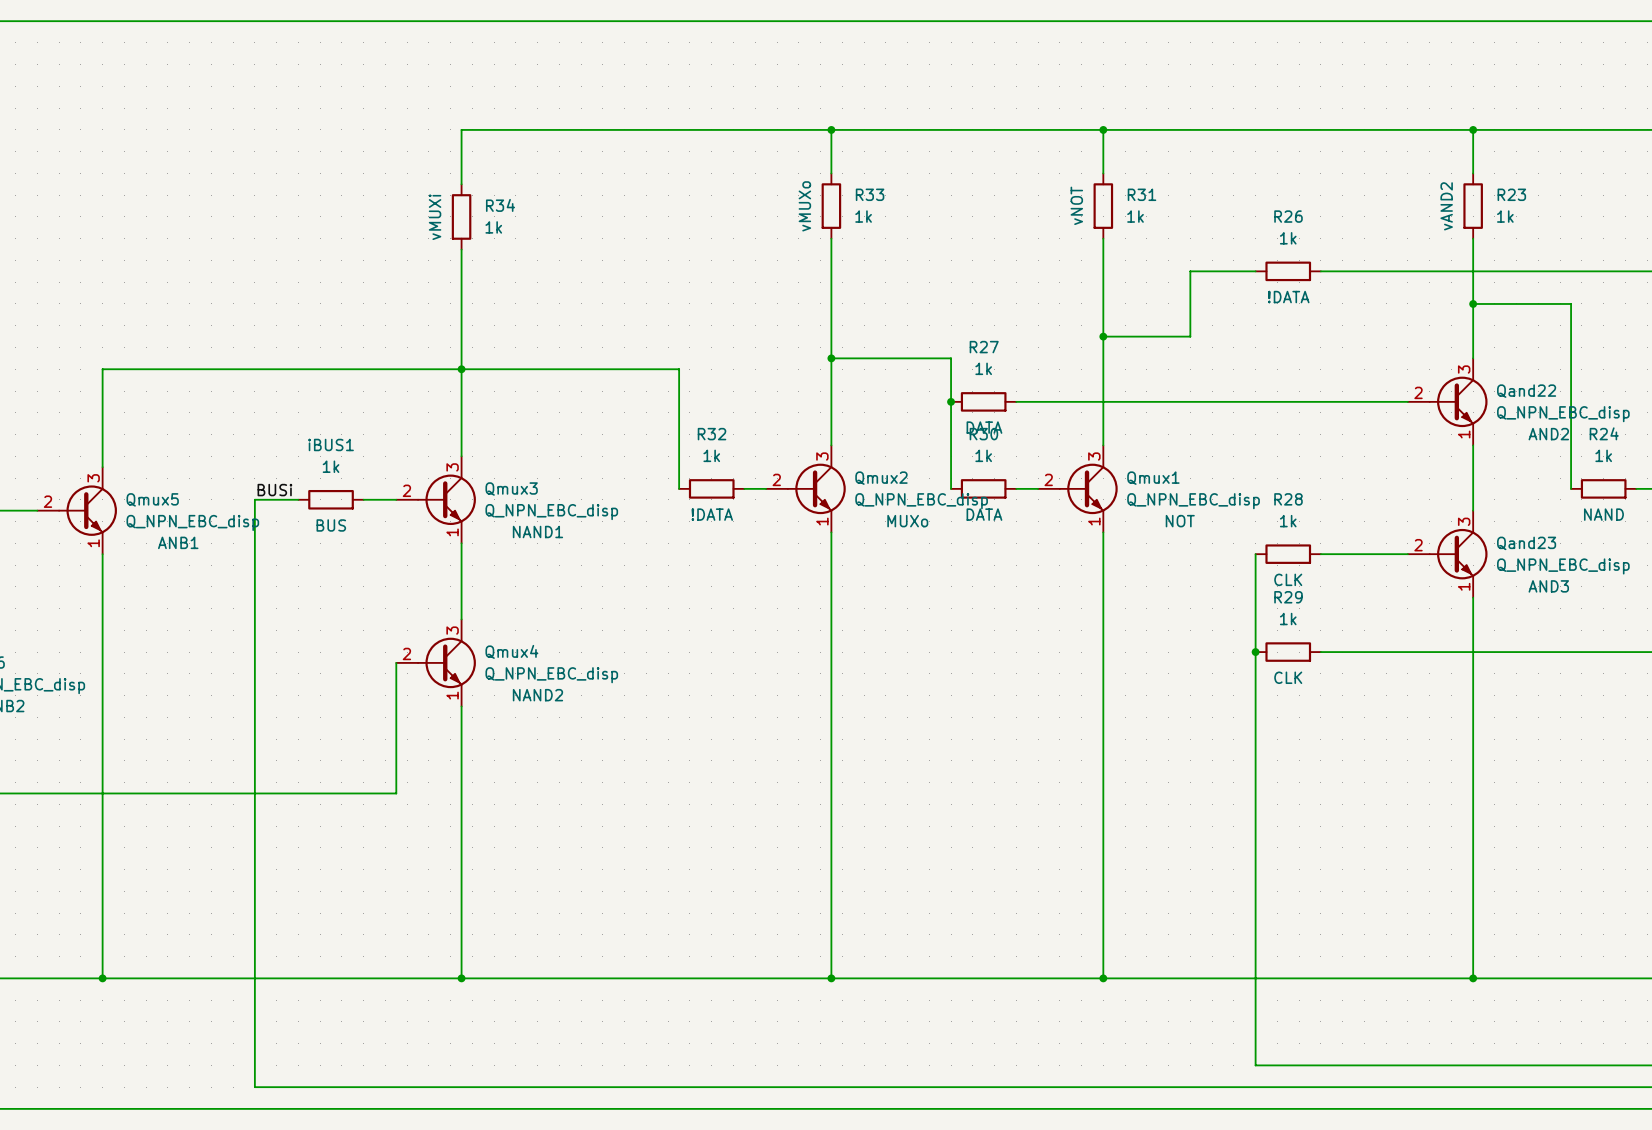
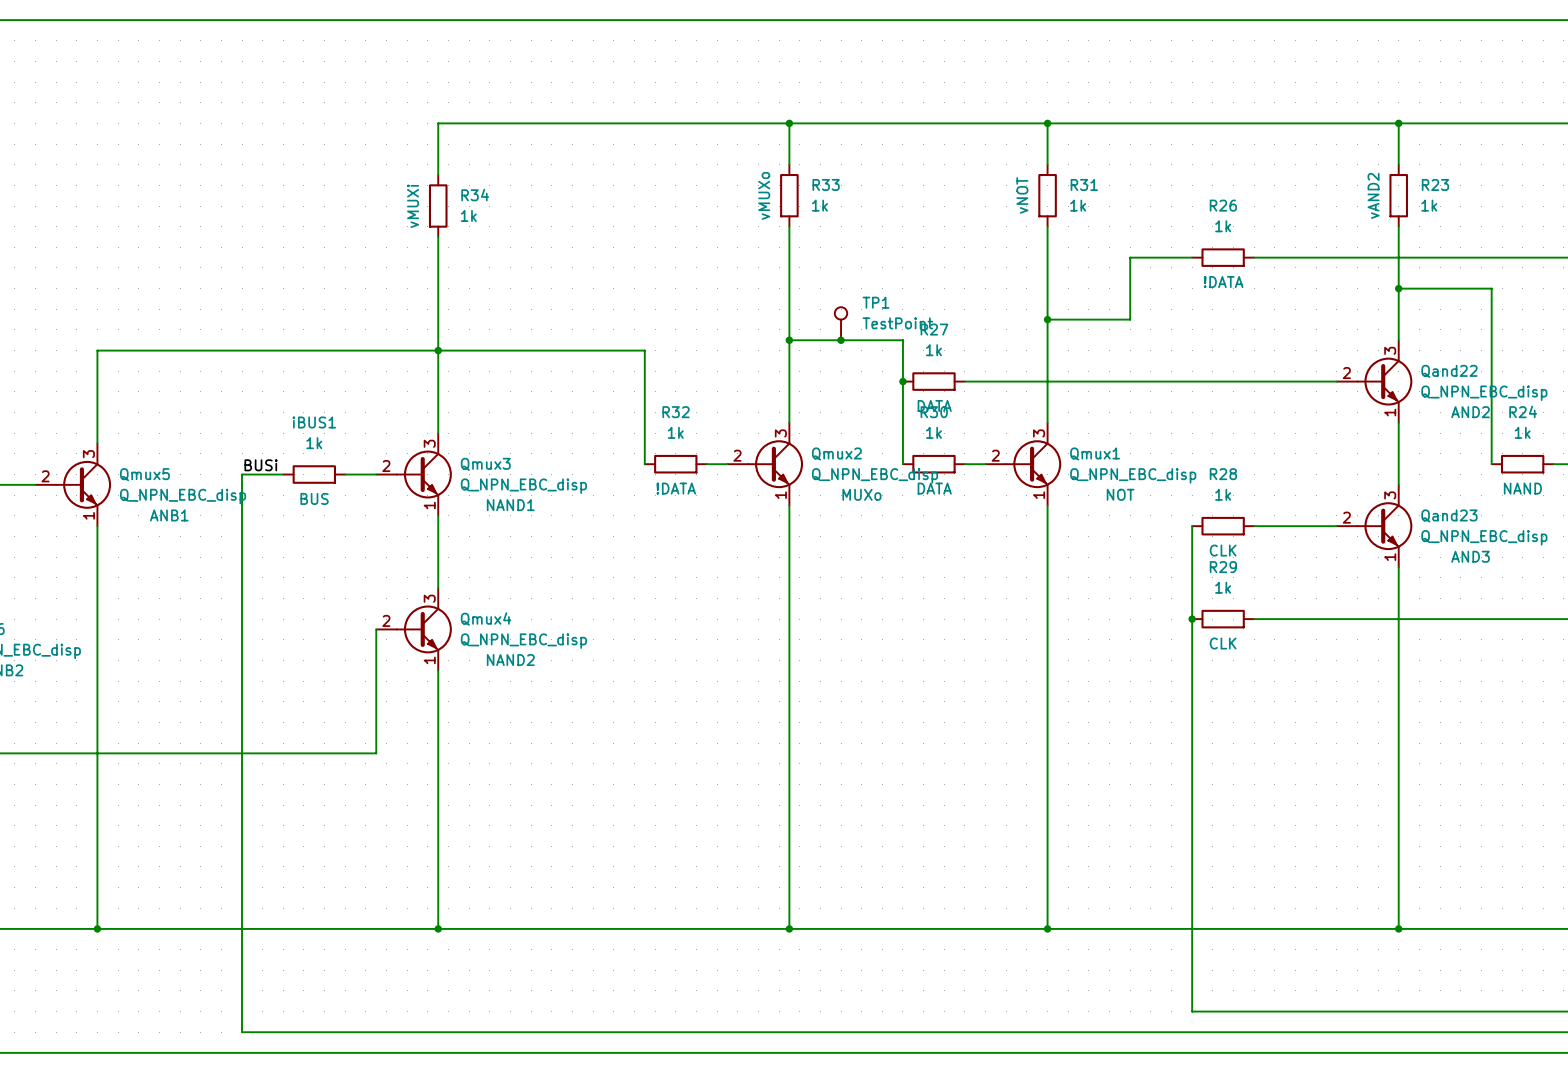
TP1: none -> TestPoint (841, 323)
junction: none -> (841, 340)

